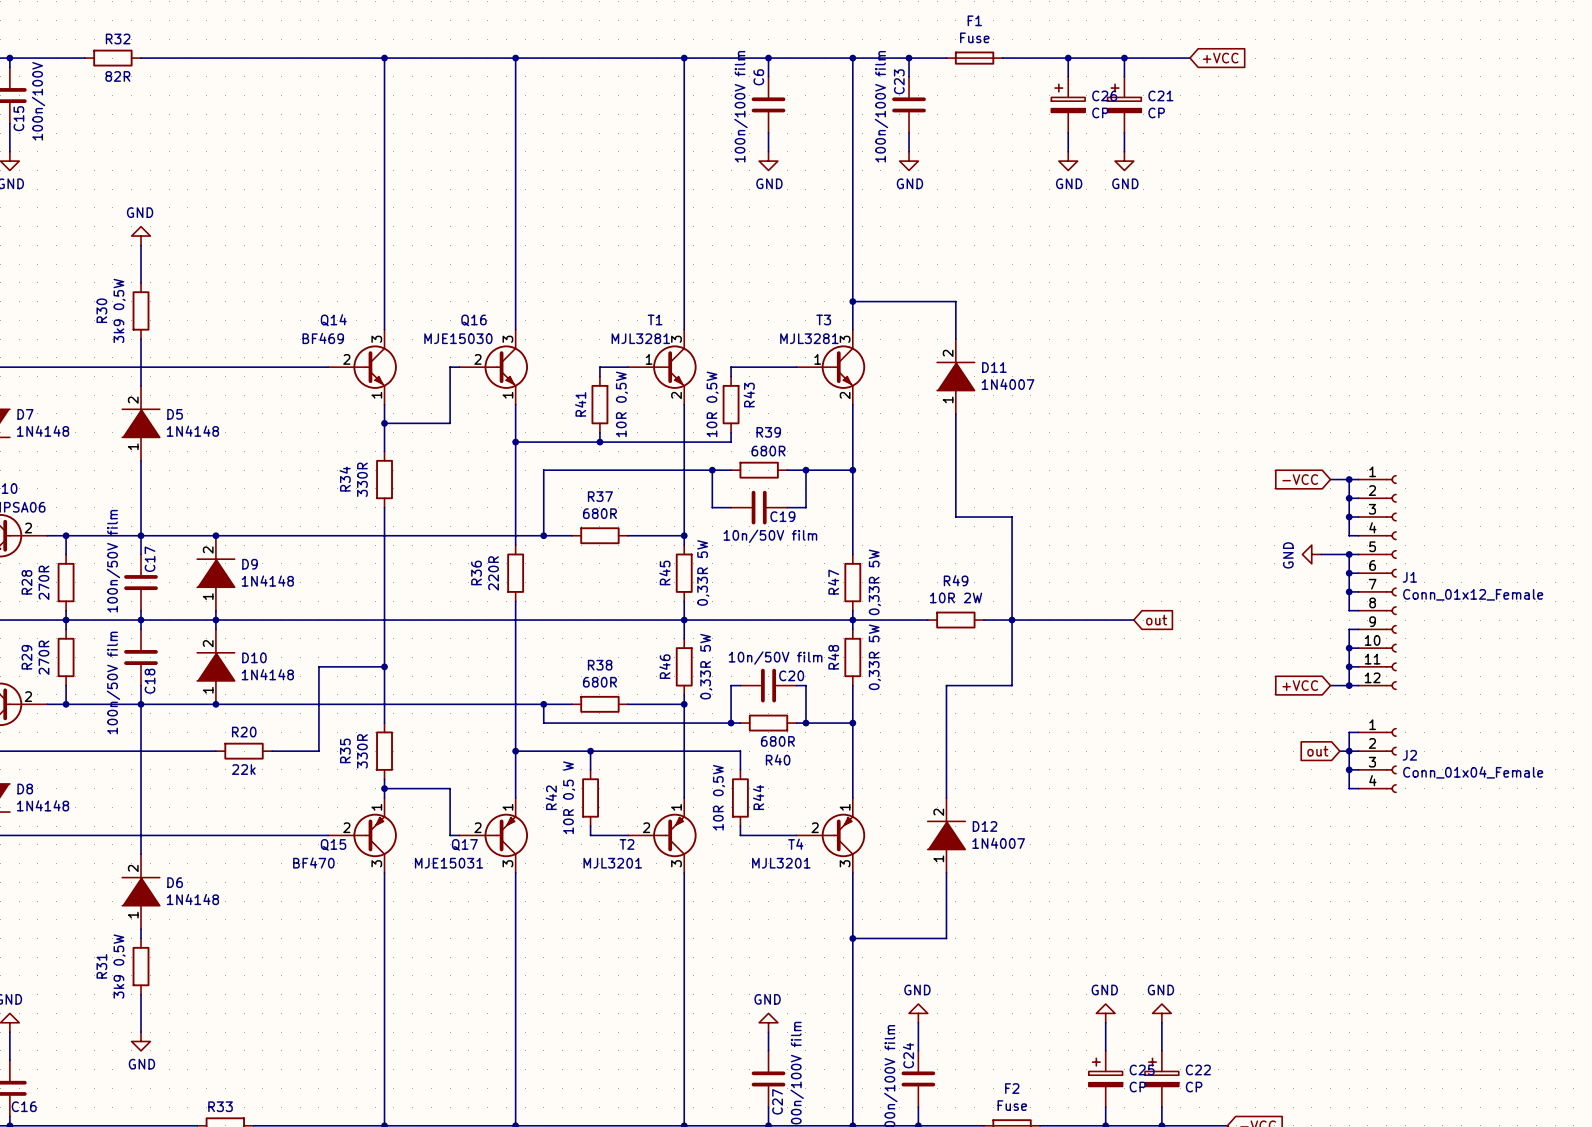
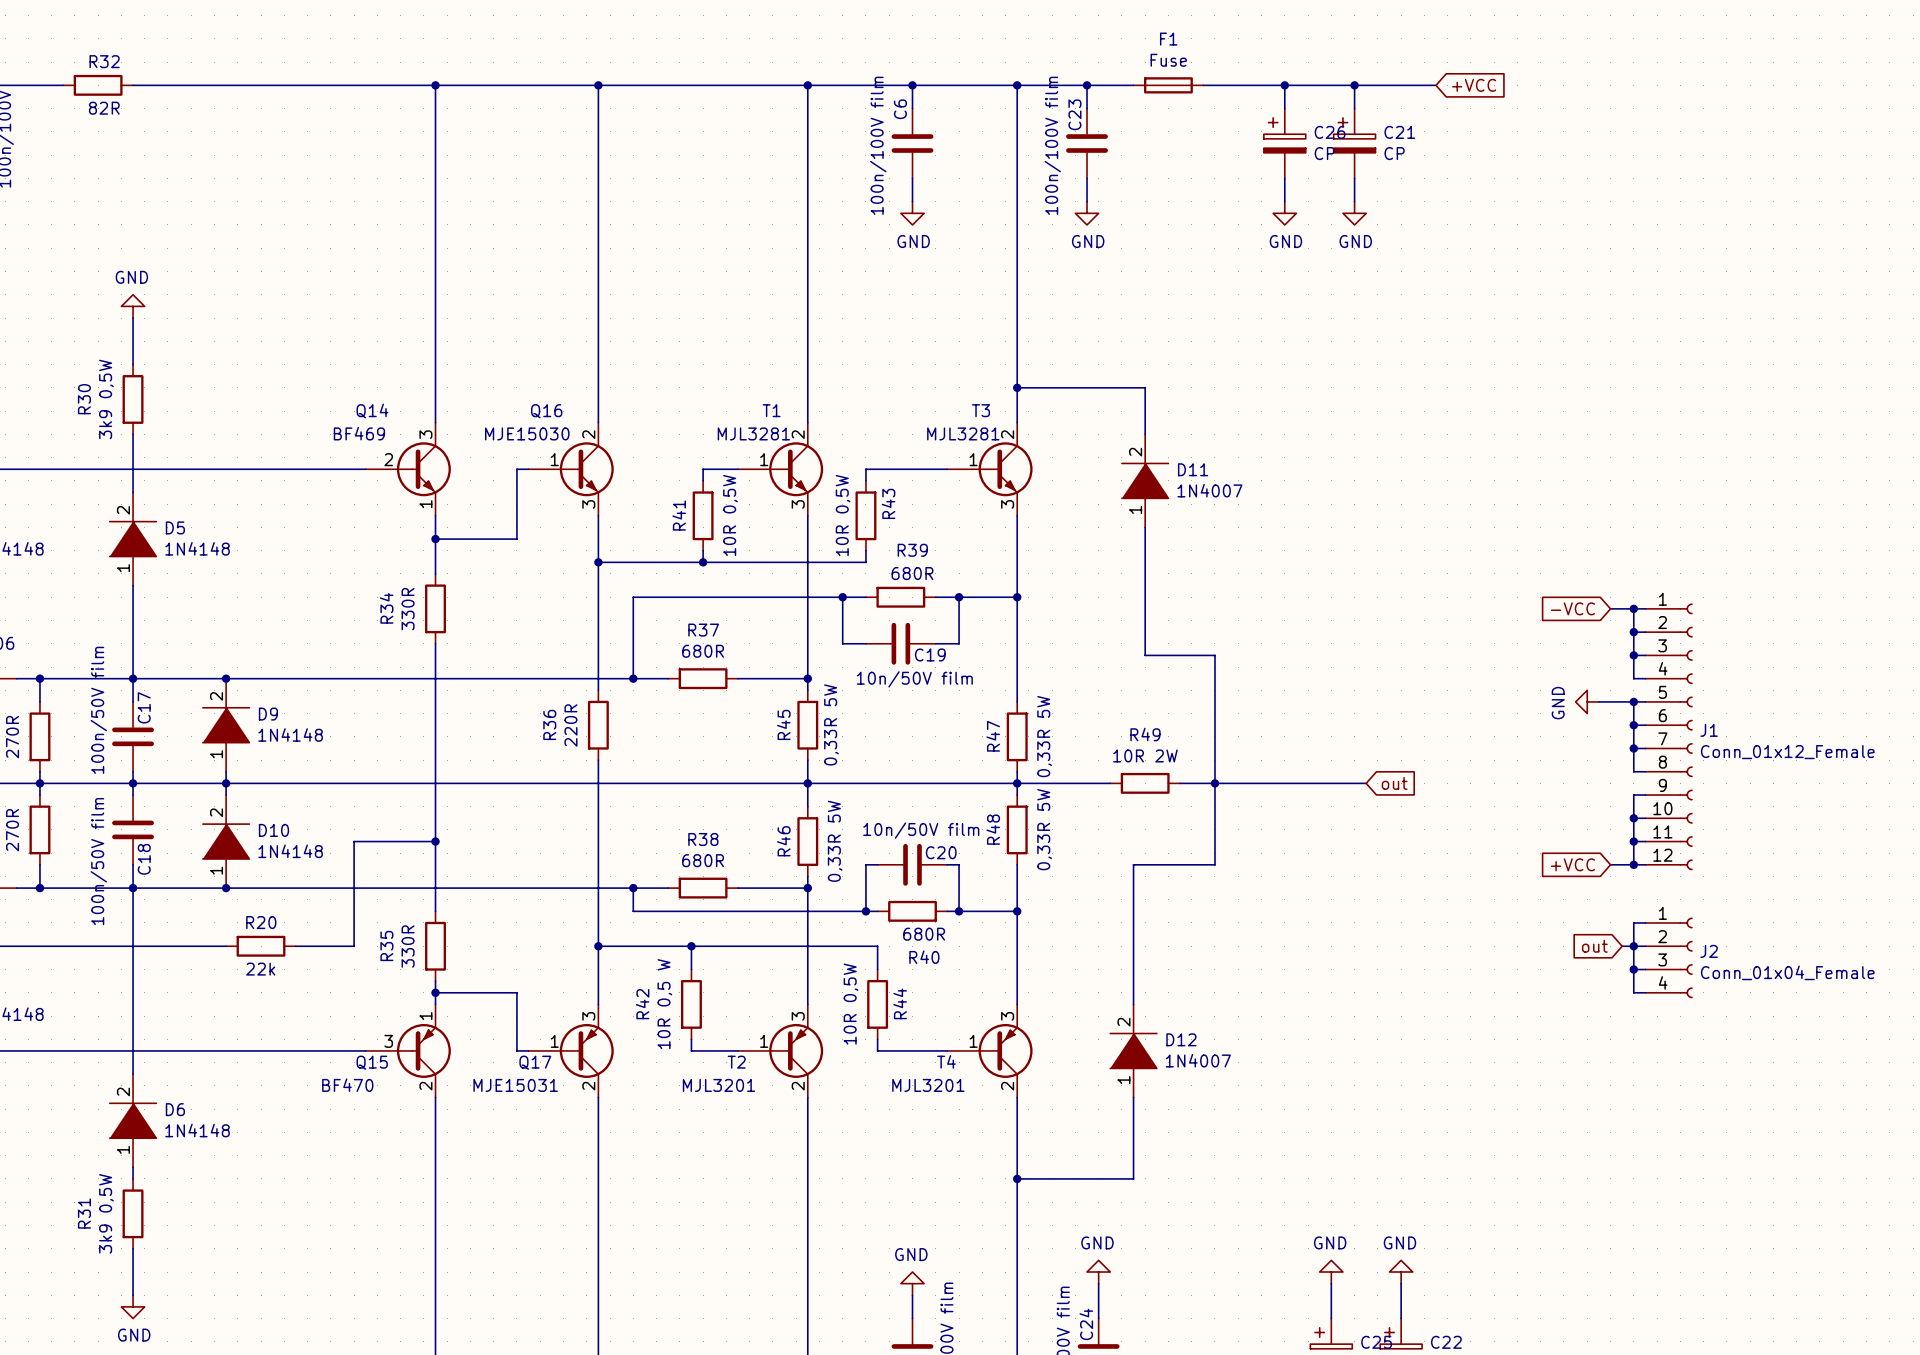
Q16 symbol: [459, 329, 529, 405] -> [528, 422, 614, 516]
T1 pin number: 3 (676, 339) -> 2 (798, 434)
T3 pin number: 3 (845, 339) -> 2 (1007, 434)
T1 pin number: 2 (676, 395) -> 3 (798, 504)
T3 pin number: 2 (845, 395) -> 3 (1007, 504)
Q15 symbol: [328, 797, 397, 873] -> [365, 1004, 451, 1098]
Q17 symbol: [459, 797, 529, 873] -> [528, 1004, 614, 1098]
T2 symbol: [628, 797, 697, 873] -> [737, 1004, 824, 1098]
T4 symbol: [796, 797, 866, 873] -> [947, 1004, 1033, 1098]

